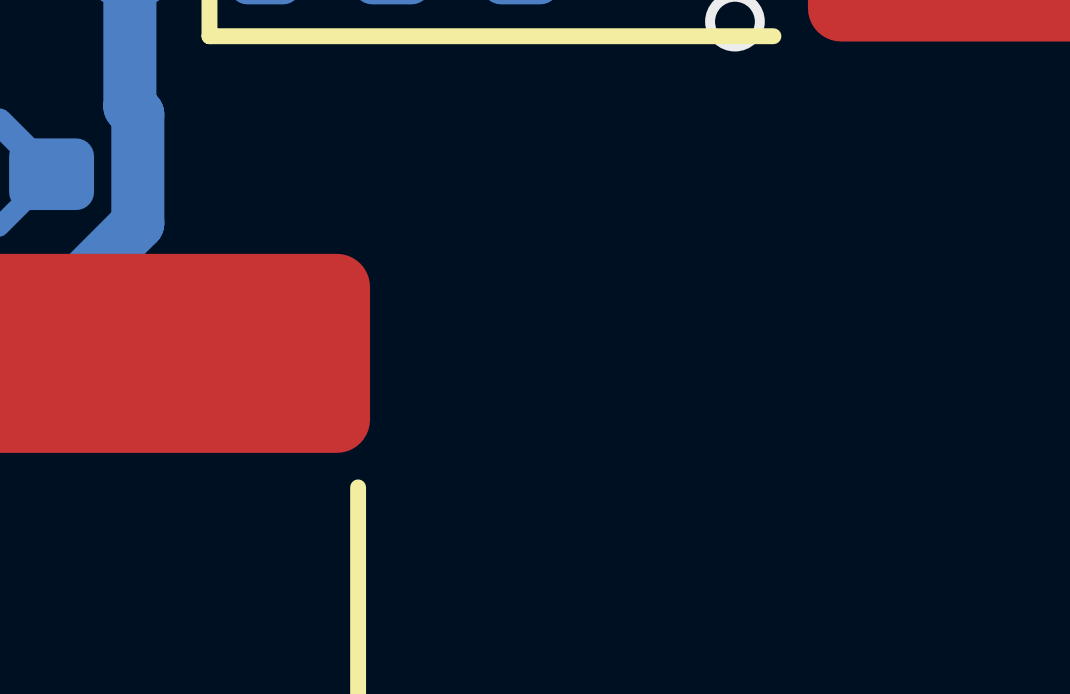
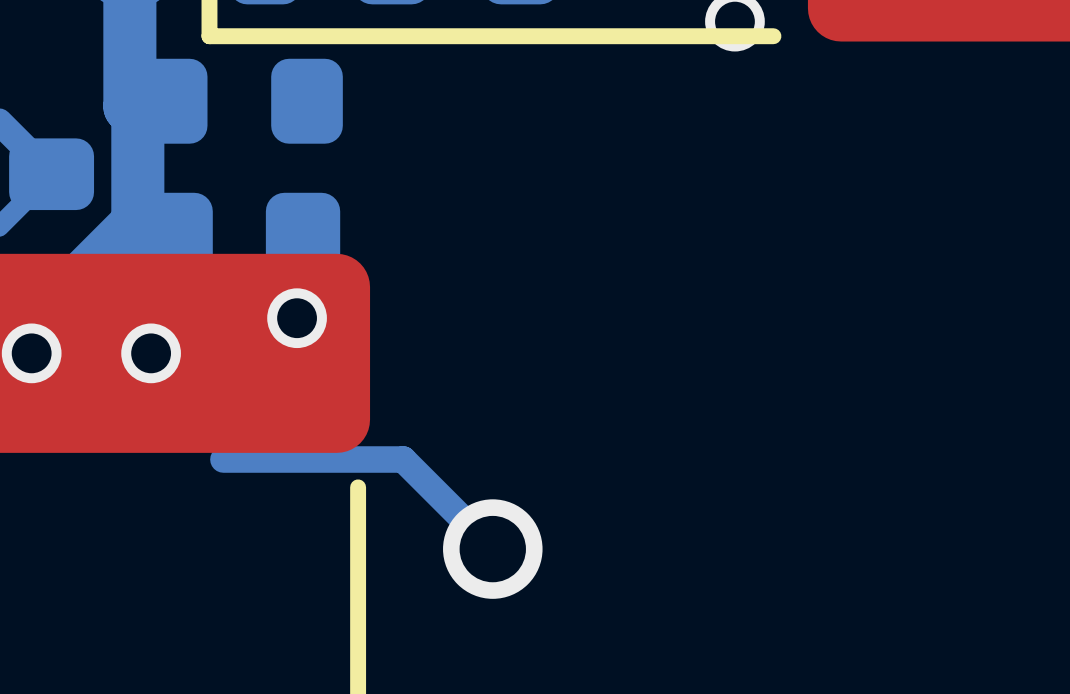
part: none -> (239, 101)
part: none -> (239, 233)
via: none -> (297, 318)
via: none -> (31, 353)
via: none -> (151, 353)
bottom track: none -> (223, 459) (403, 459) (492, 549)
via: none -> (492, 549)

